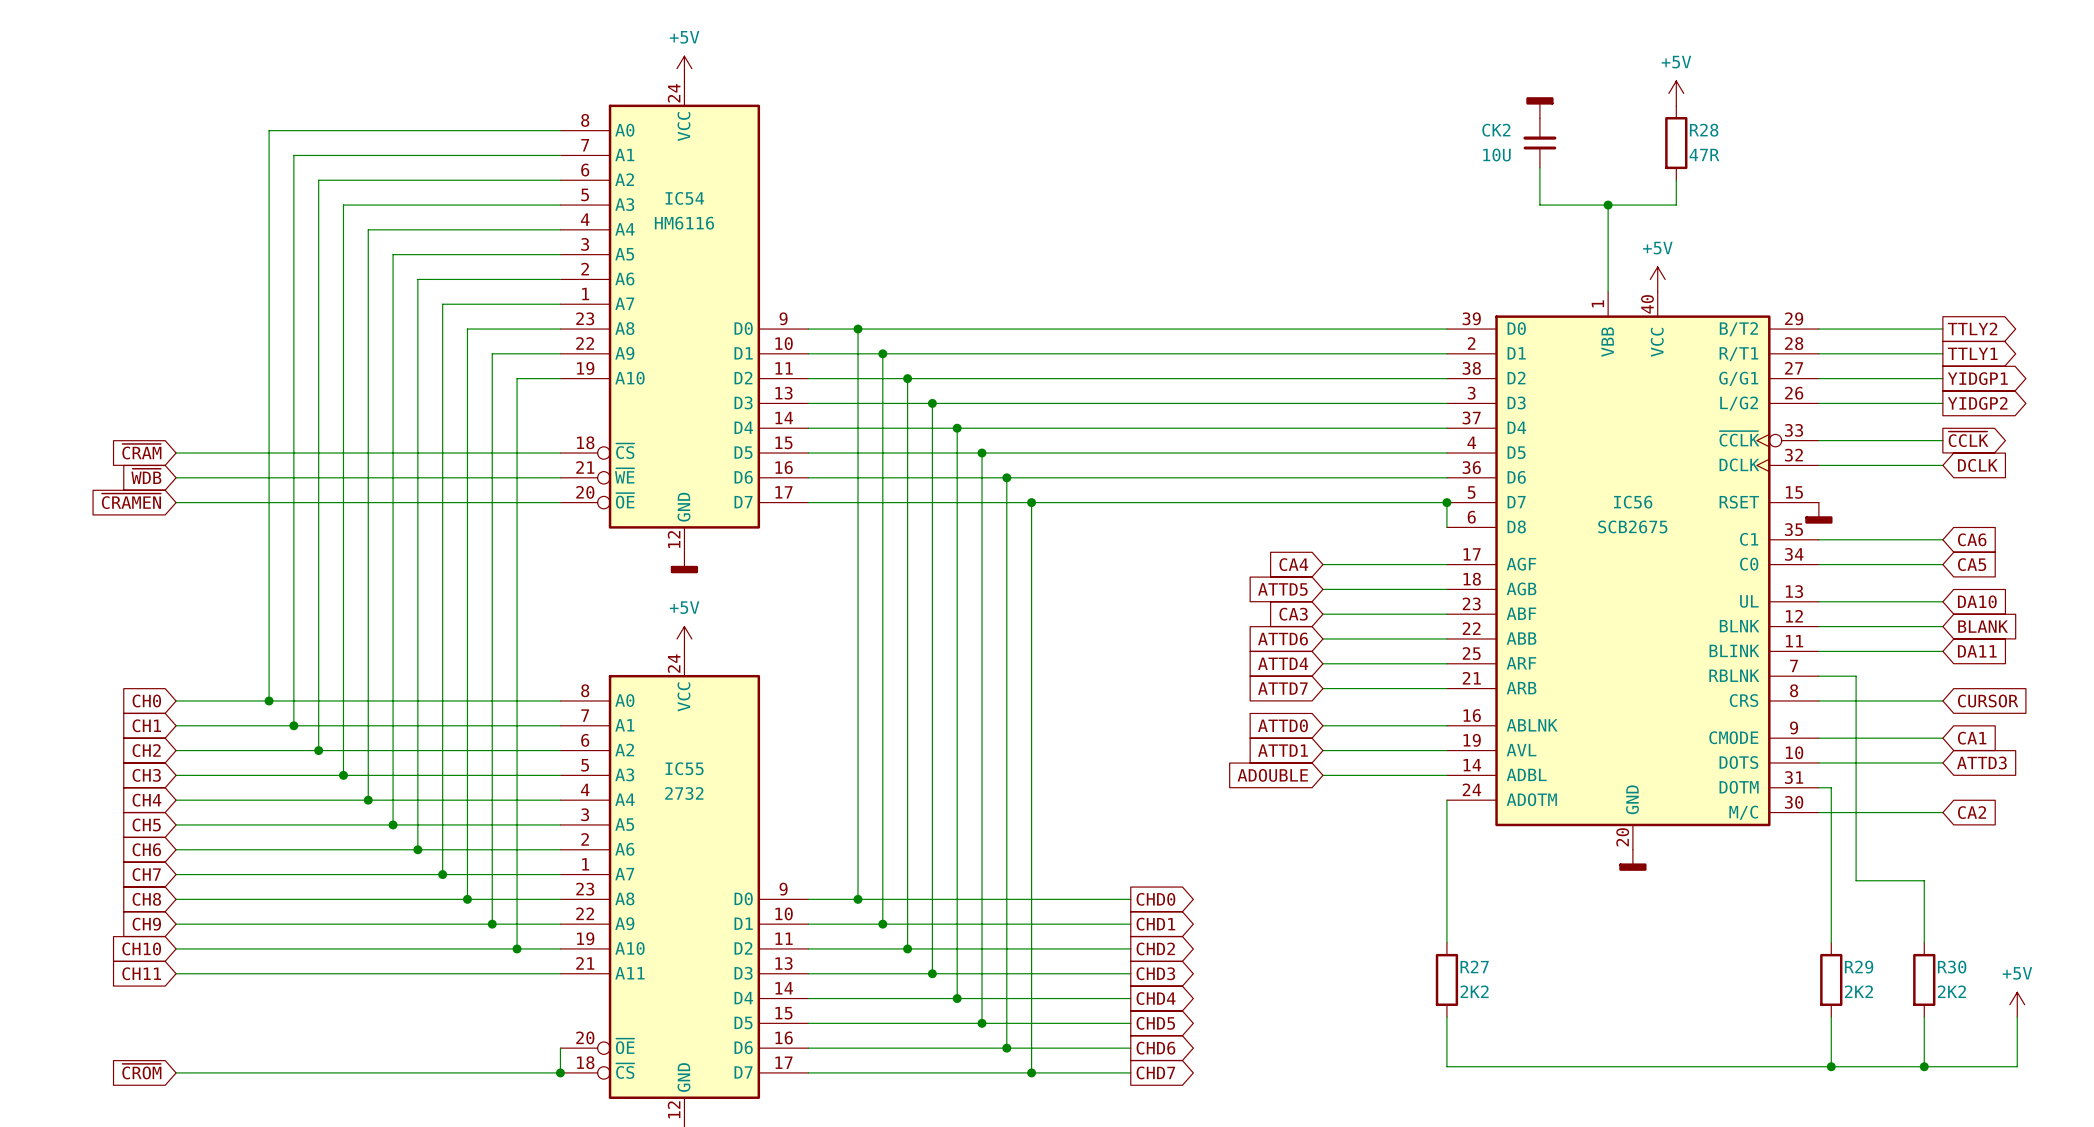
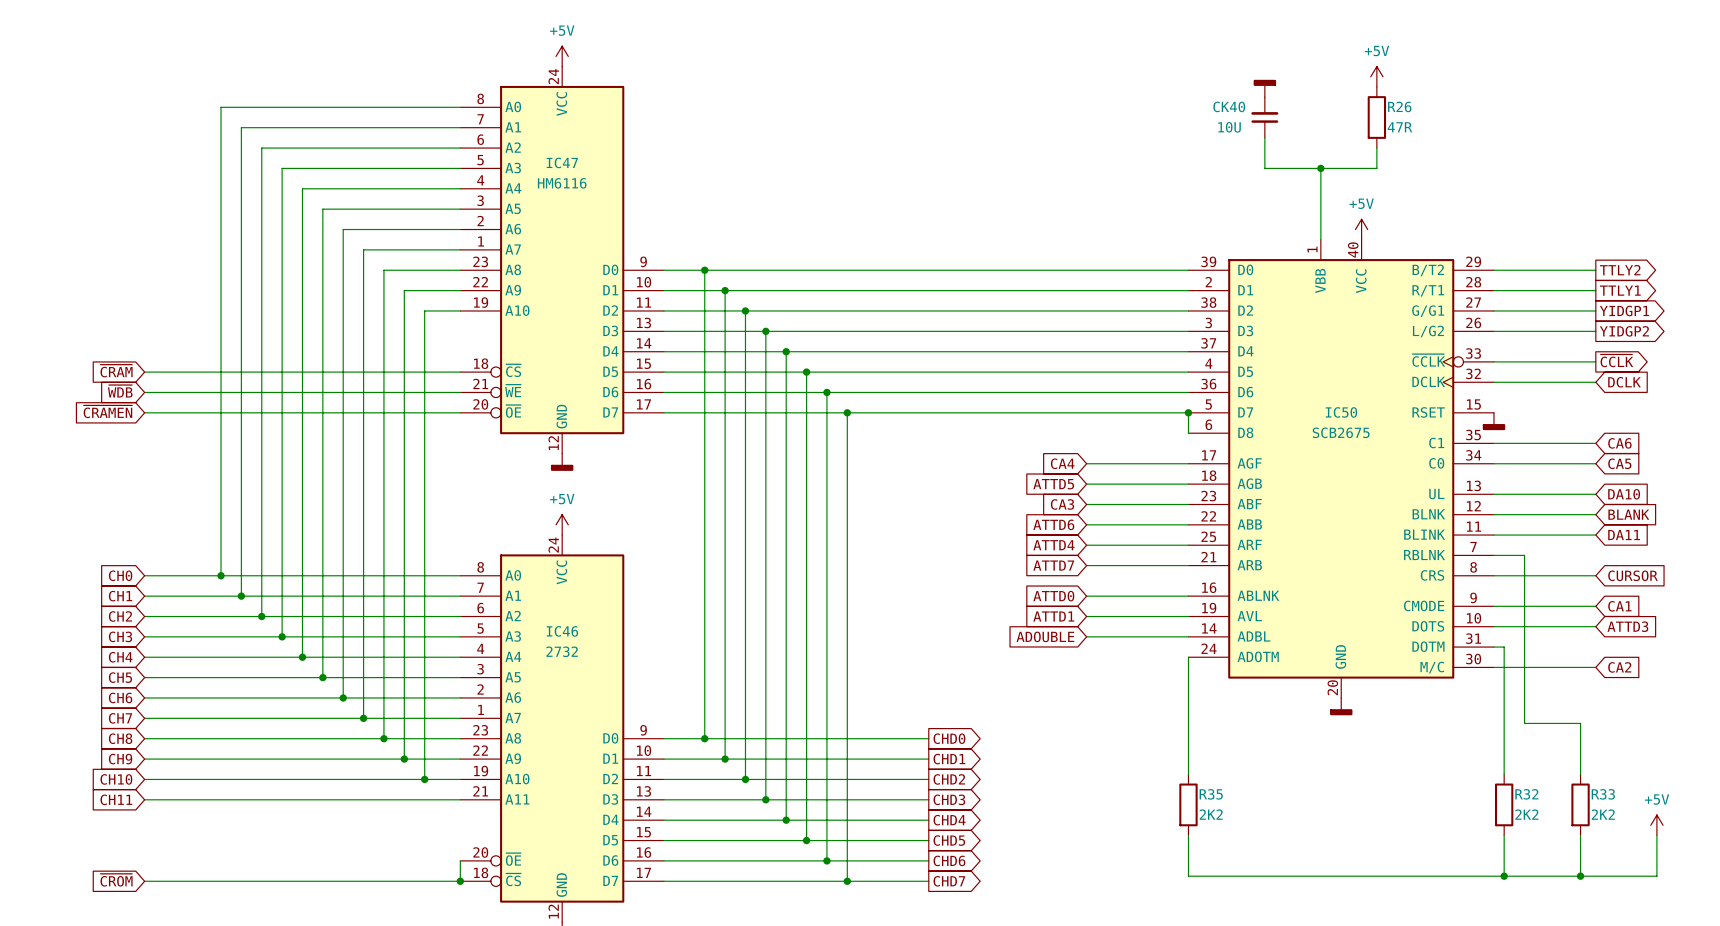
CK2 name: CK2 (1496, 130) -> CK40 (1229, 106)
R28 name: R28 (1704, 130) -> R26 (1399, 106)
IC54 name: IC54 (684, 198) -> IC47 (562, 162)
IC56 name: IC56 (1633, 502) -> IC50 (1341, 412)
IC55 name: IC55 (684, 768) -> IC46 (562, 631)
R27 name: R27 (1474, 966) -> R35 (1211, 794)
R29 name: R29 (1859, 967) -> R32 (1526, 794)
R30 name: R30 (1952, 967) -> R33 (1603, 794)

